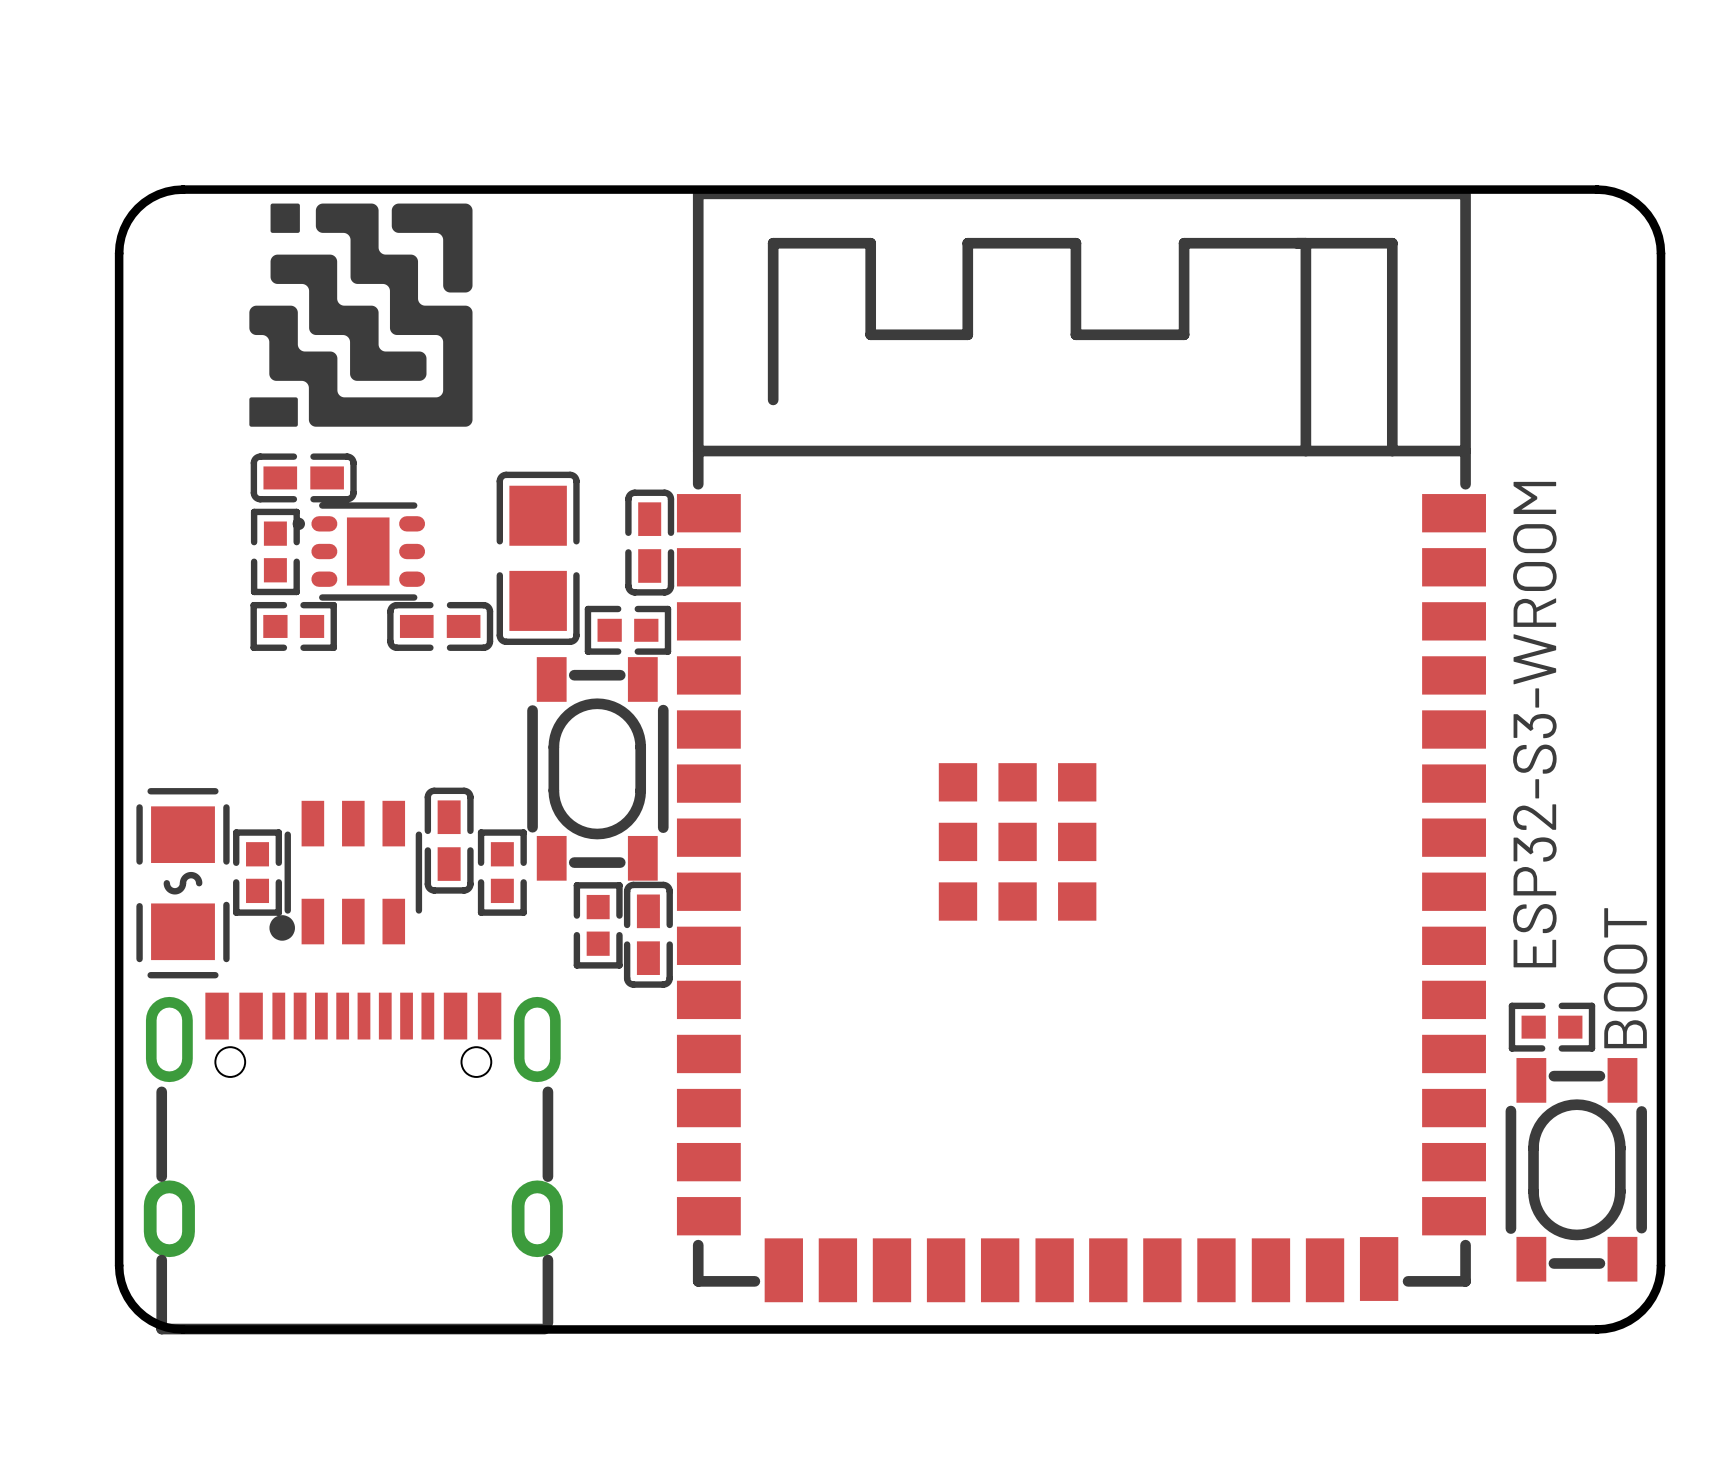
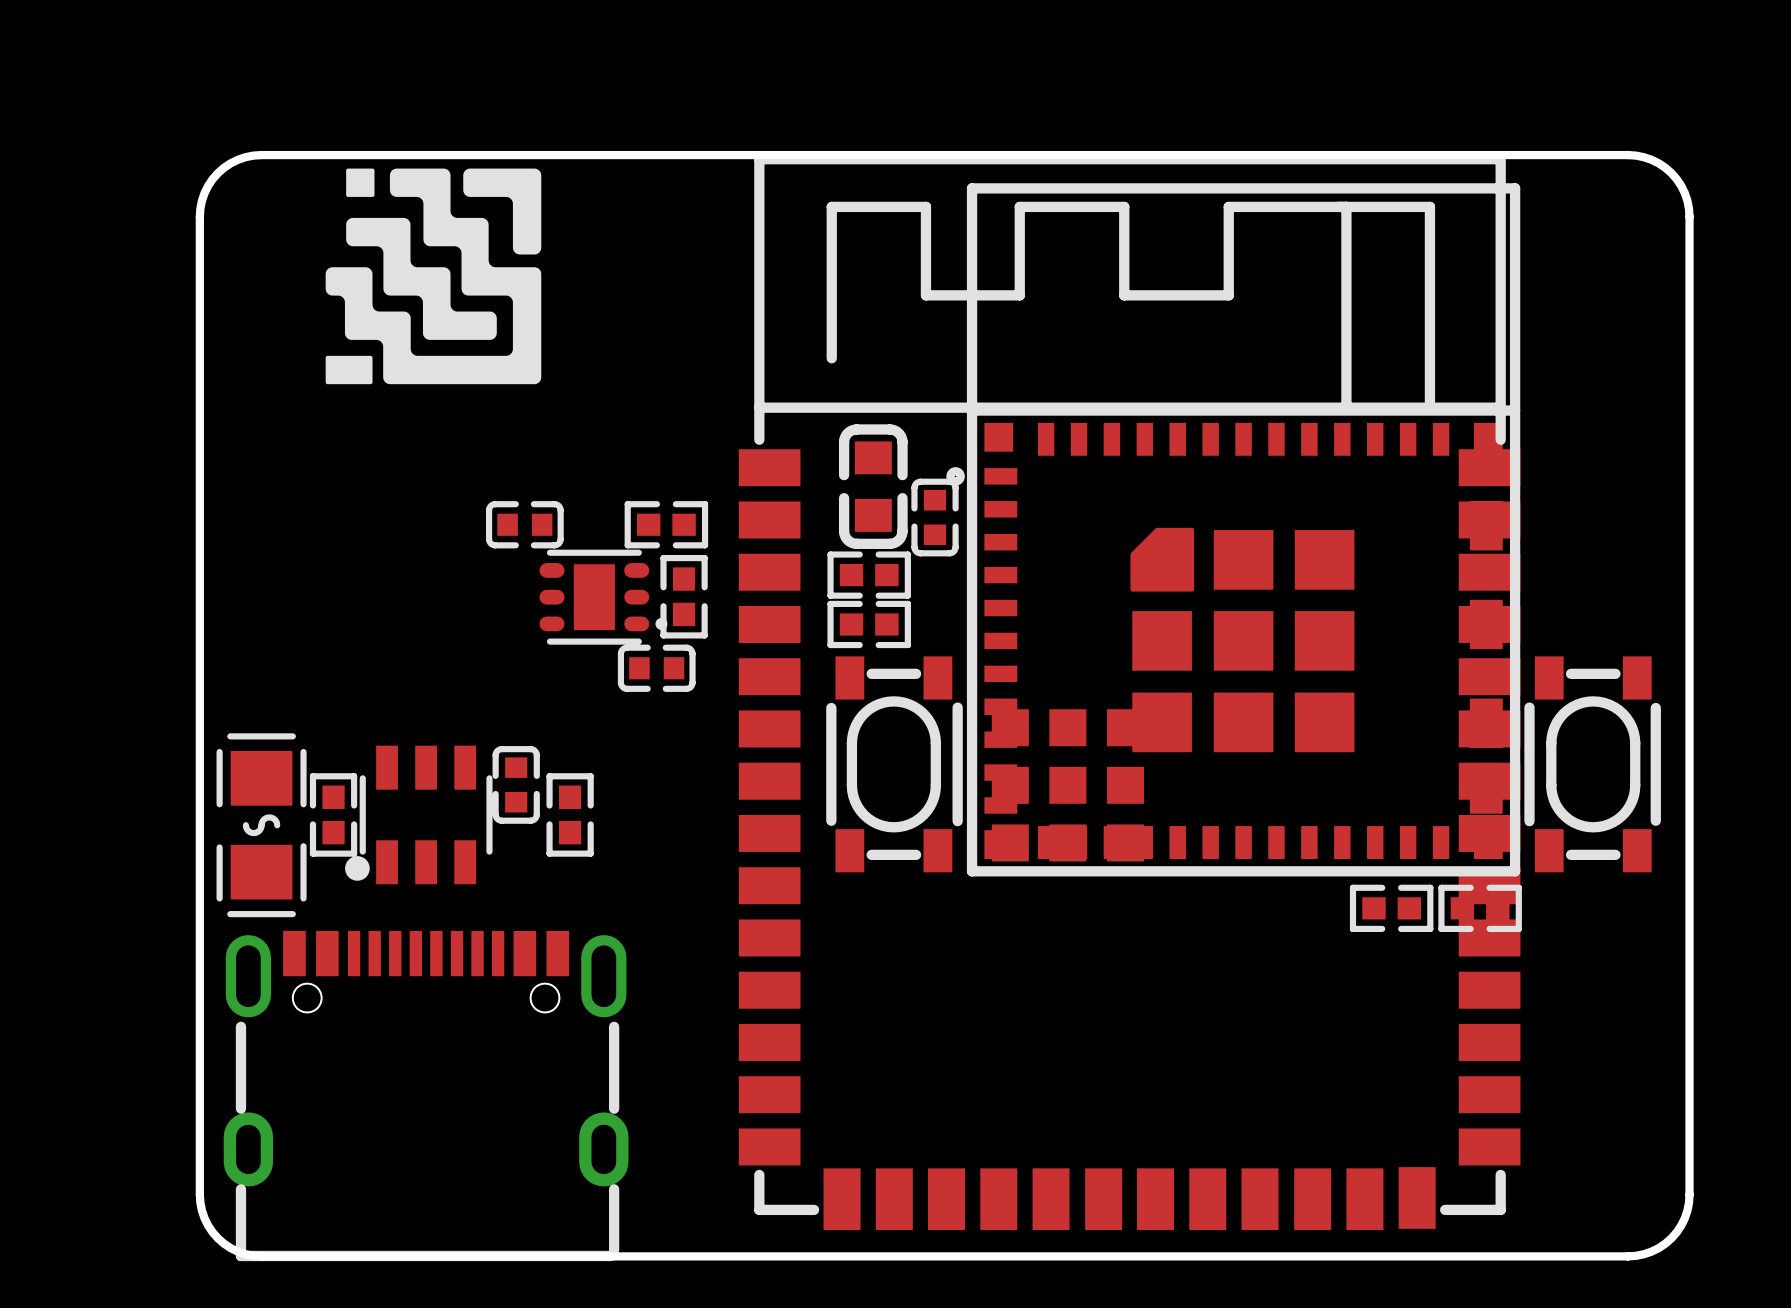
part: (303, 477) -> none
part: none -> (873, 486)
part: (649, 542) -> none
part: (275, 551) -> none
part rotation: 0° (358, 551) -> 180° (603, 597)
part position: (358, 551) -> (603, 597)
part: (538, 558) -> none
part: none -> (935, 517)
part: none -> (524, 524)
part: none -> (666, 524)
part: none -> (1233, 529)
part: none -> (869, 575)
part: (293, 626) -> none
part: (440, 626) -> none
part rotation: 0° (627, 630) -> 90° clockwise (684, 596)
part: none -> (869, 624)
part: none -> (656, 668)
text: ESP32-S3-WROOM (1534, 724) -> none
part position: (597, 768) -> (894, 764)
part footprint: [424, 787, 474, 894] -> [492, 746, 540, 824]
part: (598, 925) -> none
part: (648, 934) -> none
part: none -> (1391, 908)
part: none -> (1480, 908)
text: BOOT (1625, 978) -> none
part: (1551, 1027) -> none
part position: (1576, 1169) -> (1592, 764)

